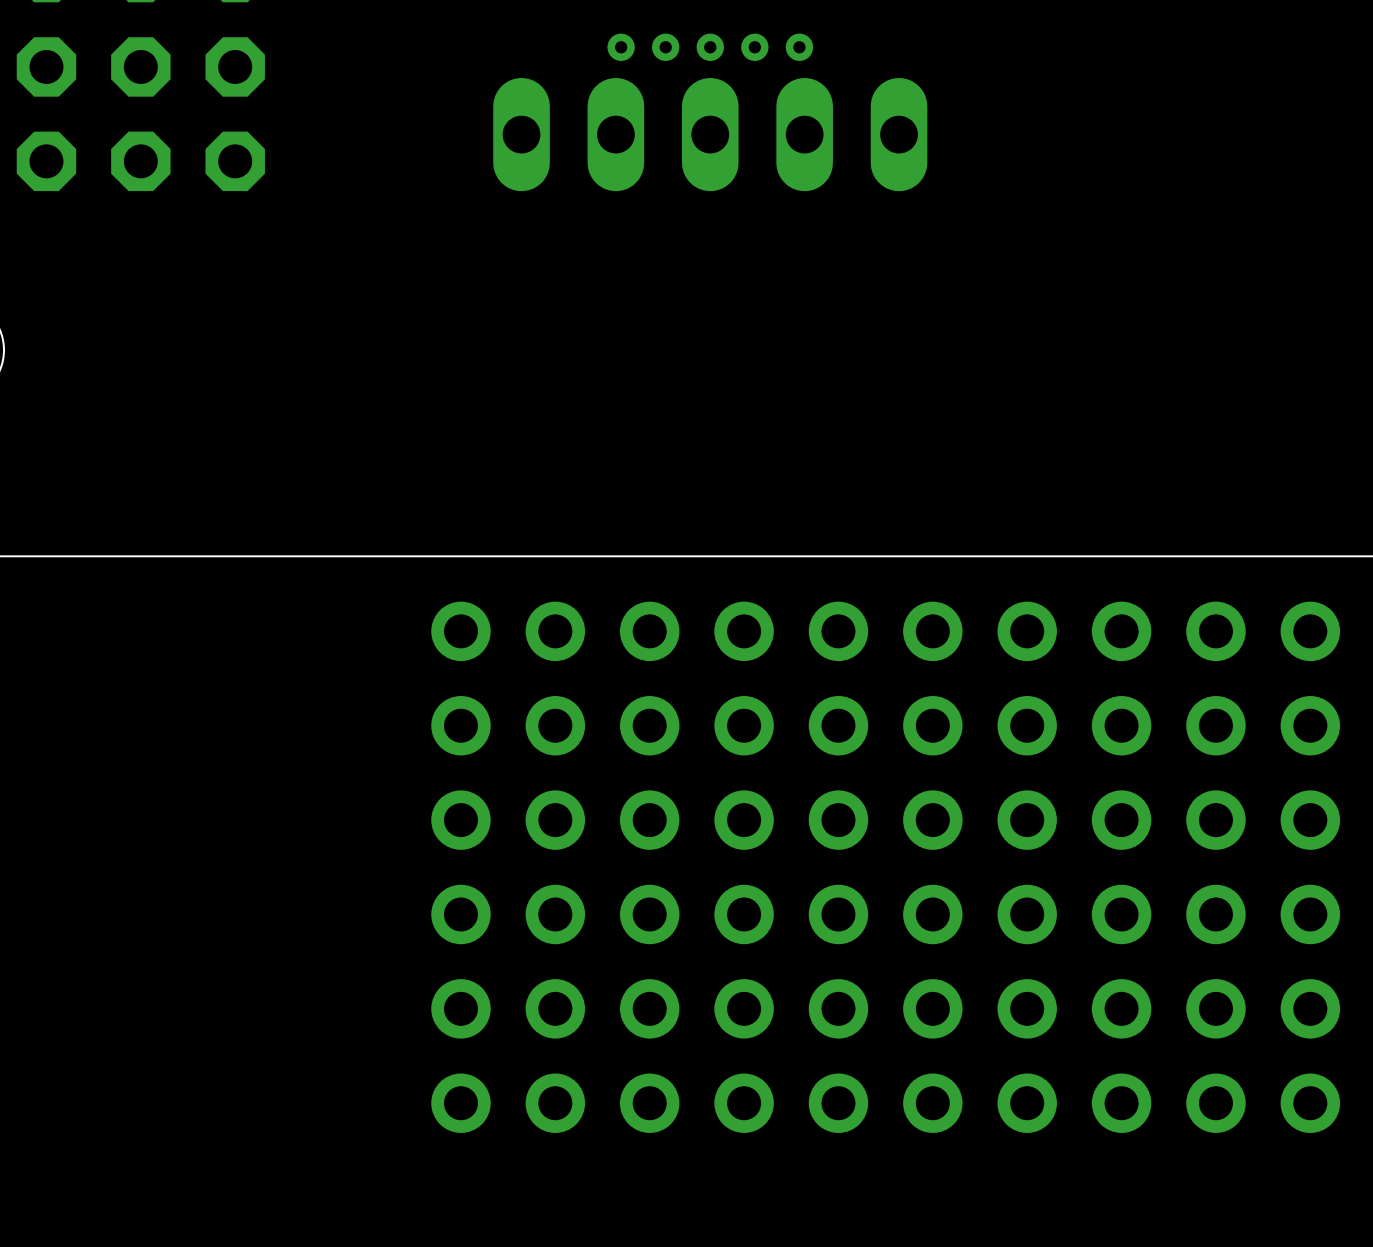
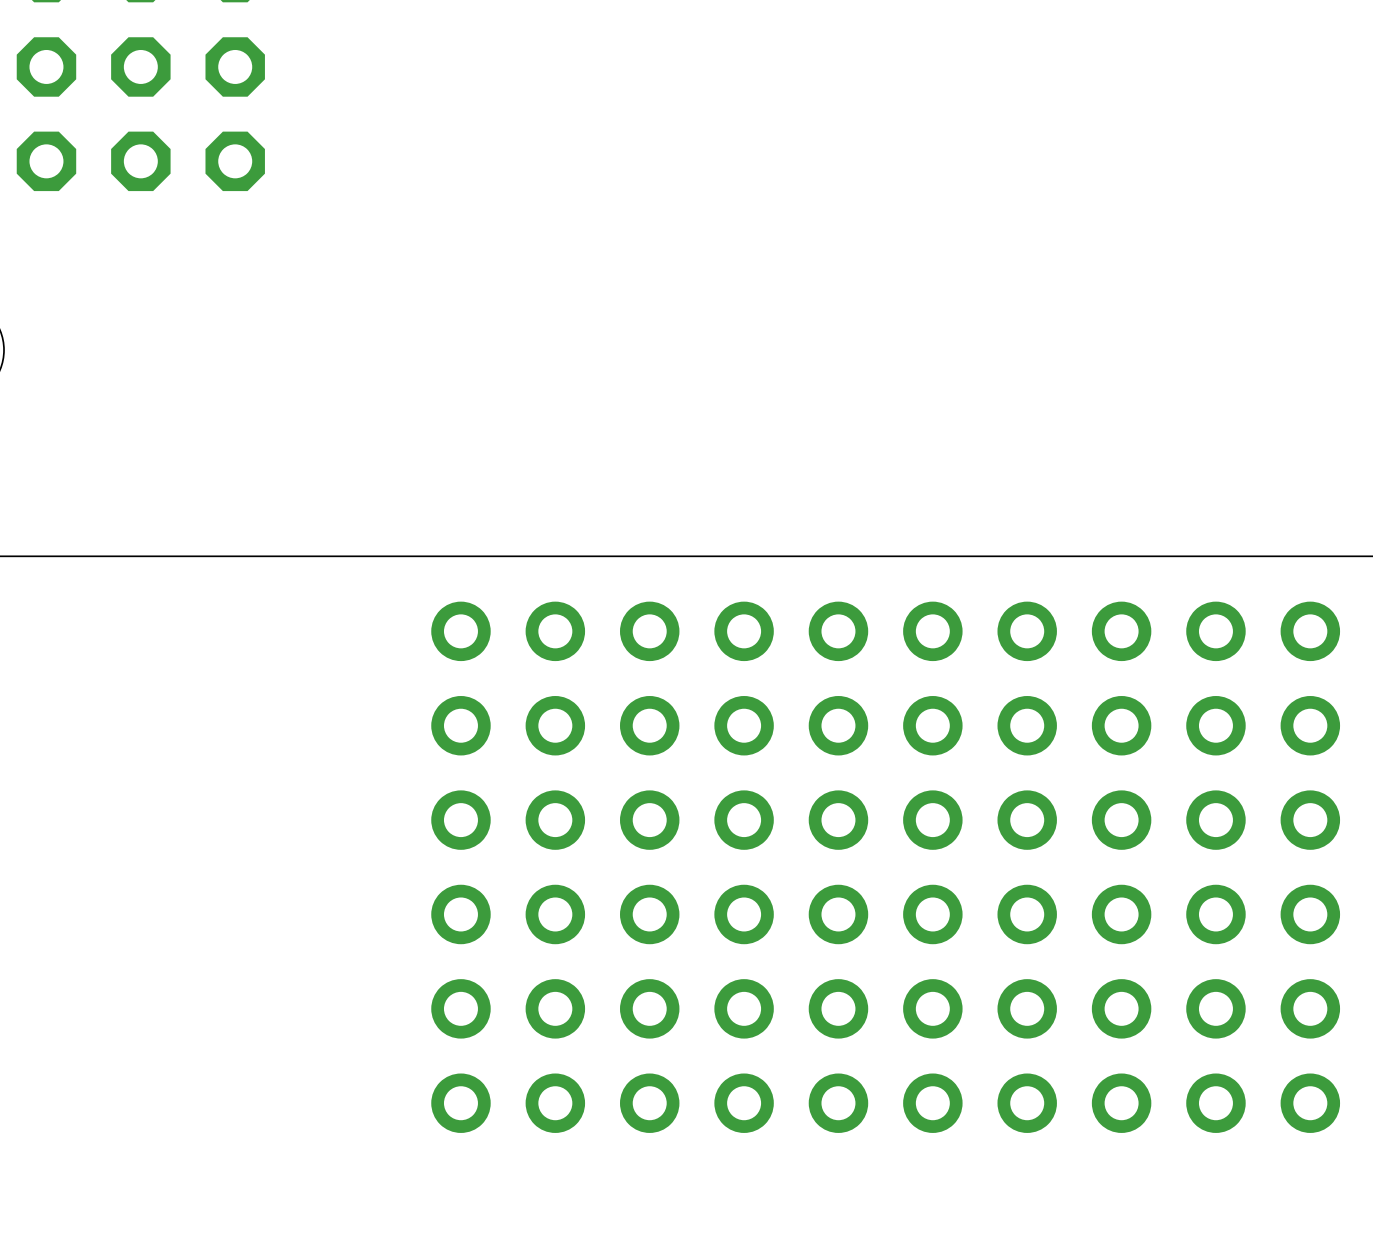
via: (621, 47) -> none
via: (665, 47) -> none
via: (710, 47) -> none
via: (754, 47) -> none
via: (799, 47) -> none
part: (710, 134) -> none

